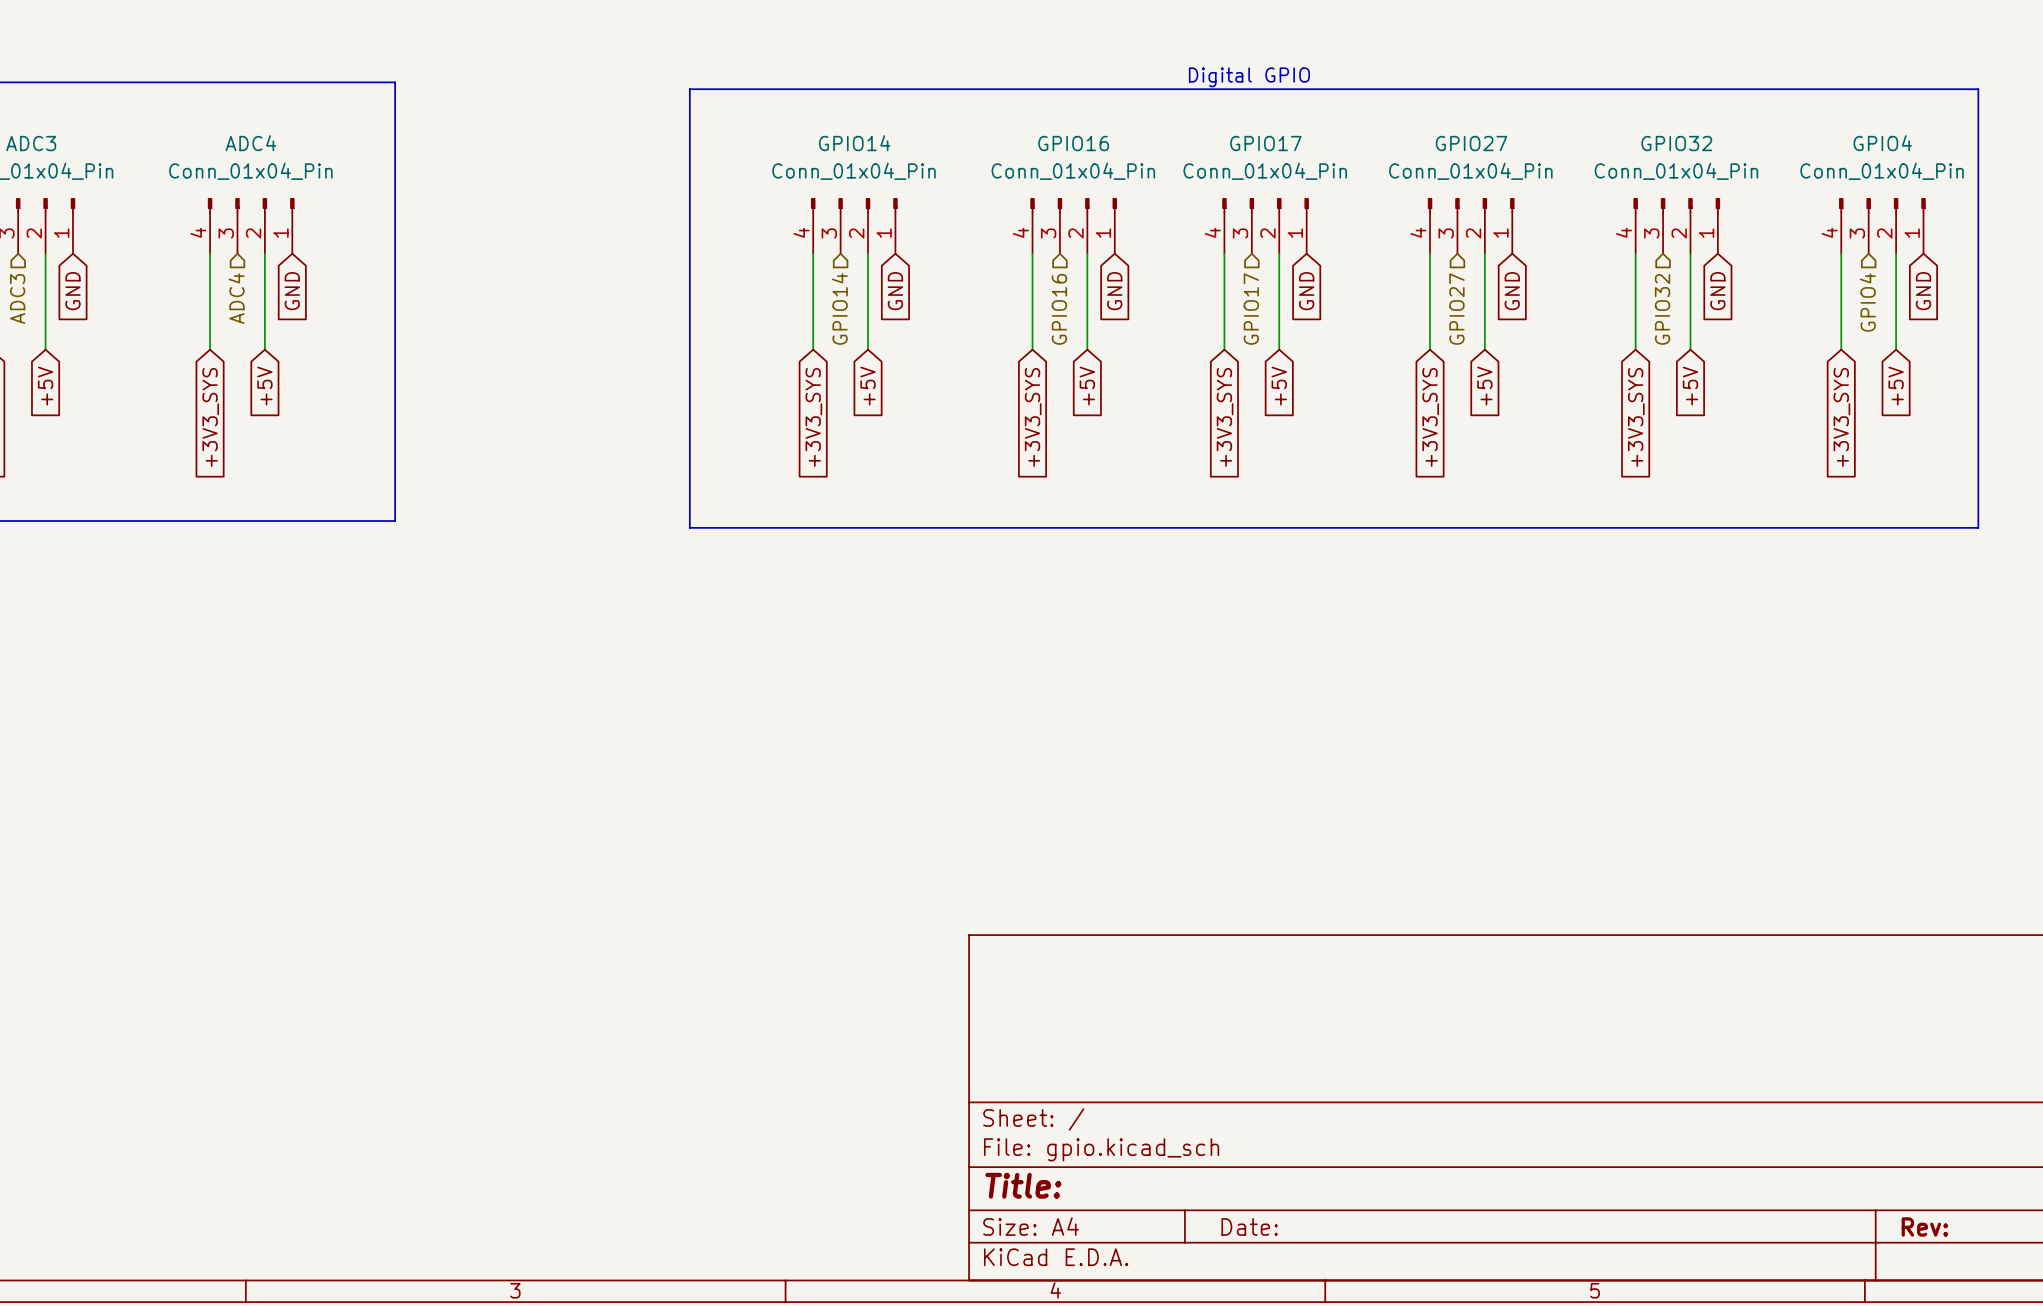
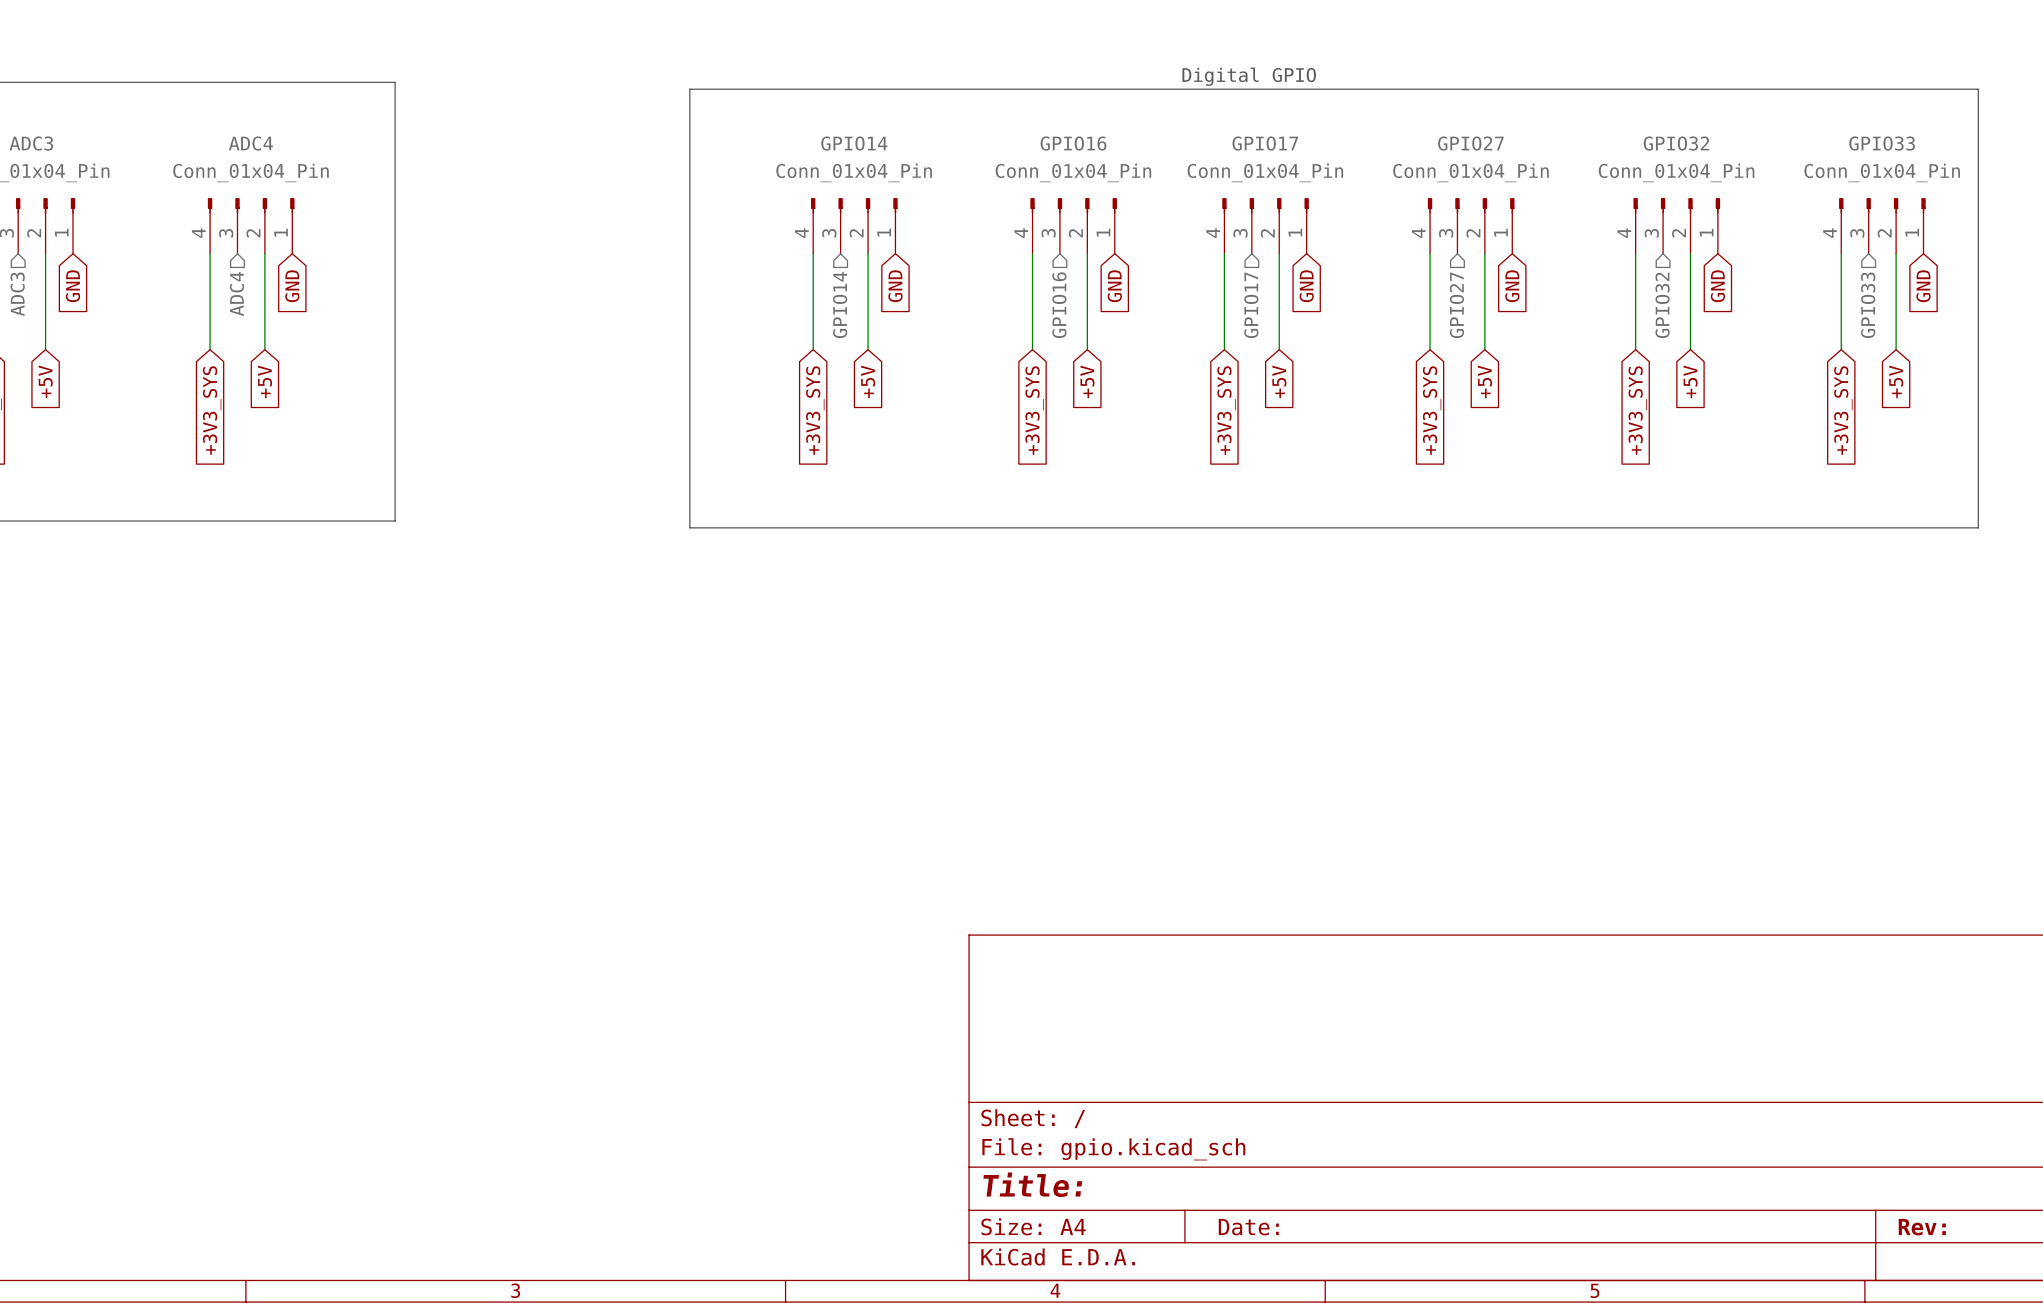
GPIO4 name: GPIO4 (1882, 143) -> GPIO33 (1882, 143)
hierarchical label: GPIO4 (1867, 302) -> GPIO33 (1868, 305)

